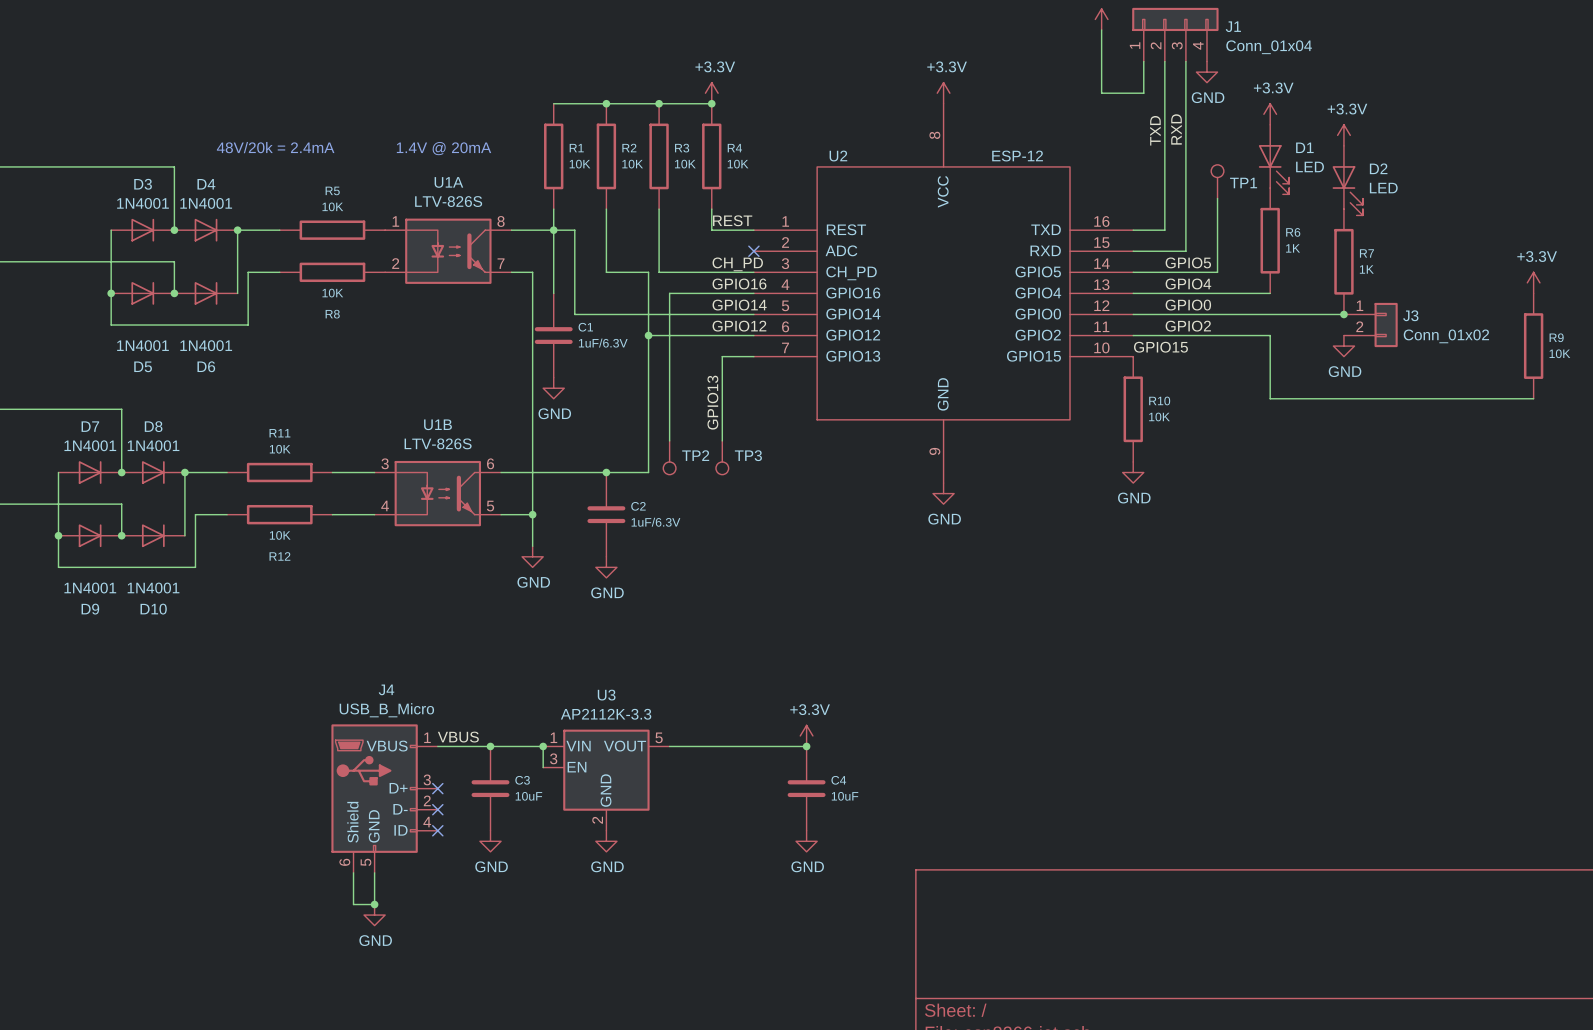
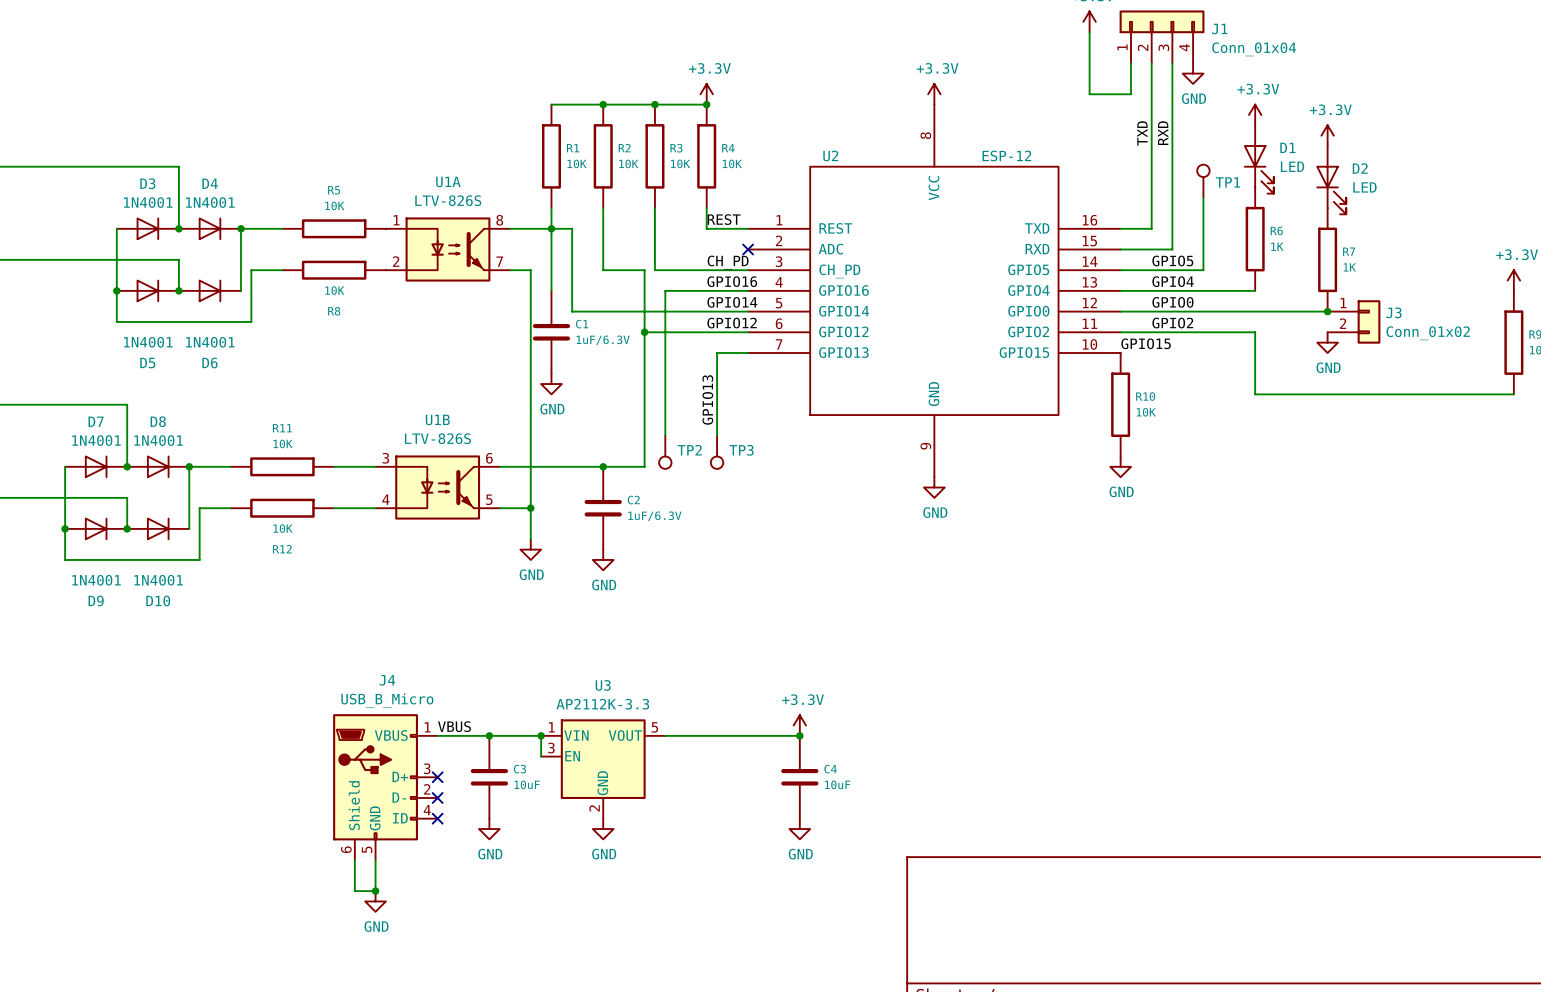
text: 48V/20k = 2.4mA (275, 147) -> none
text: 1.4V @ 20mA (444, 148) -> none

